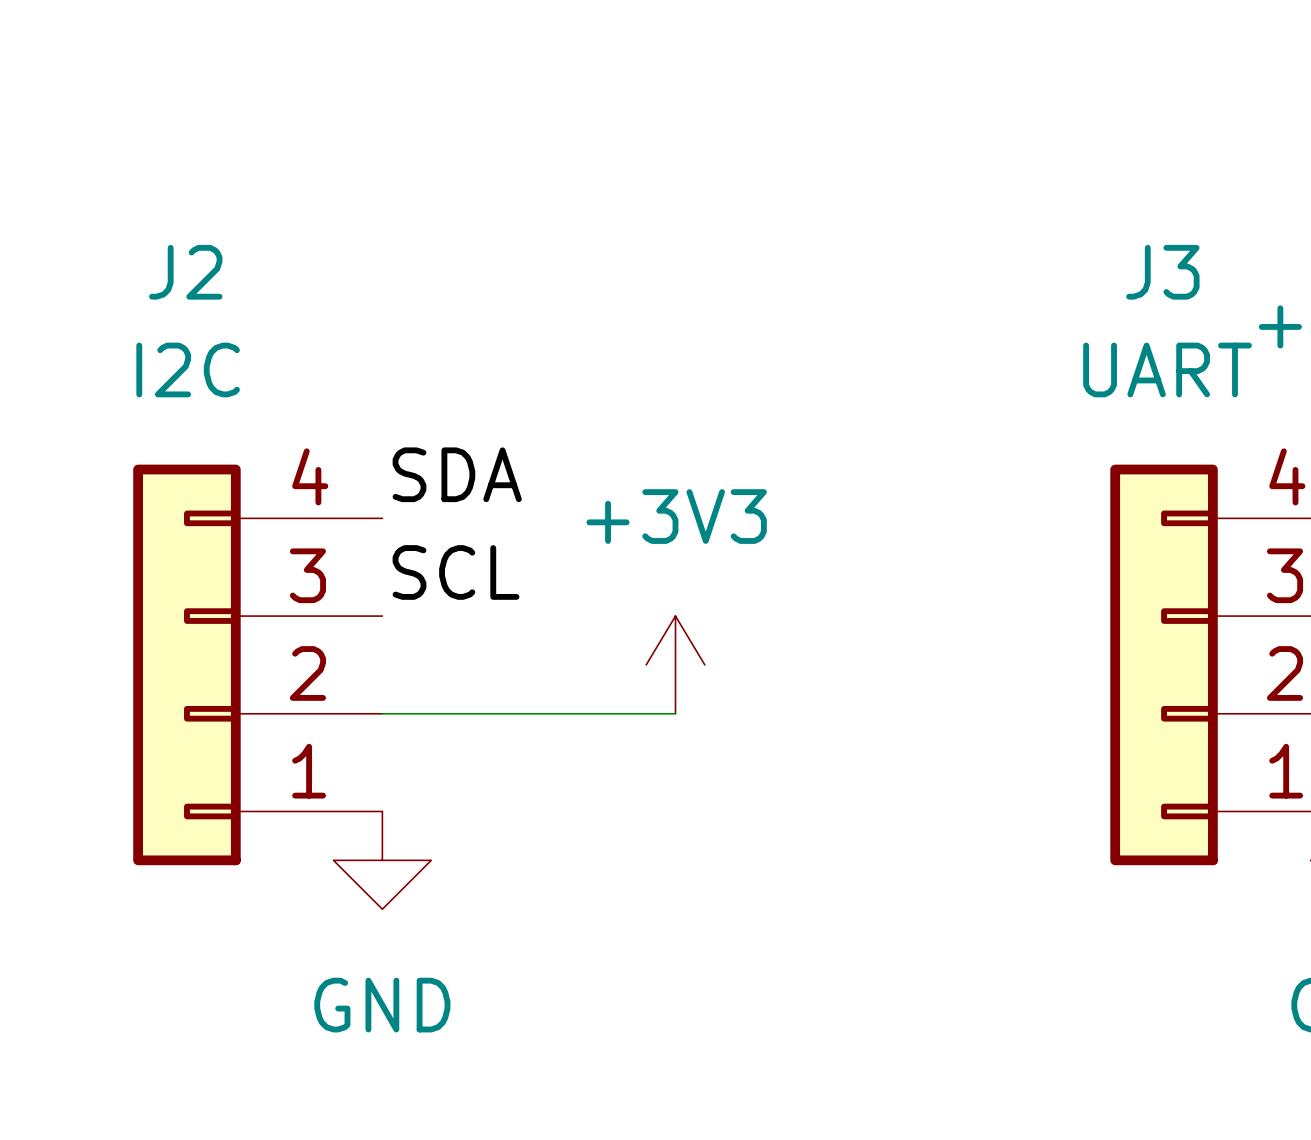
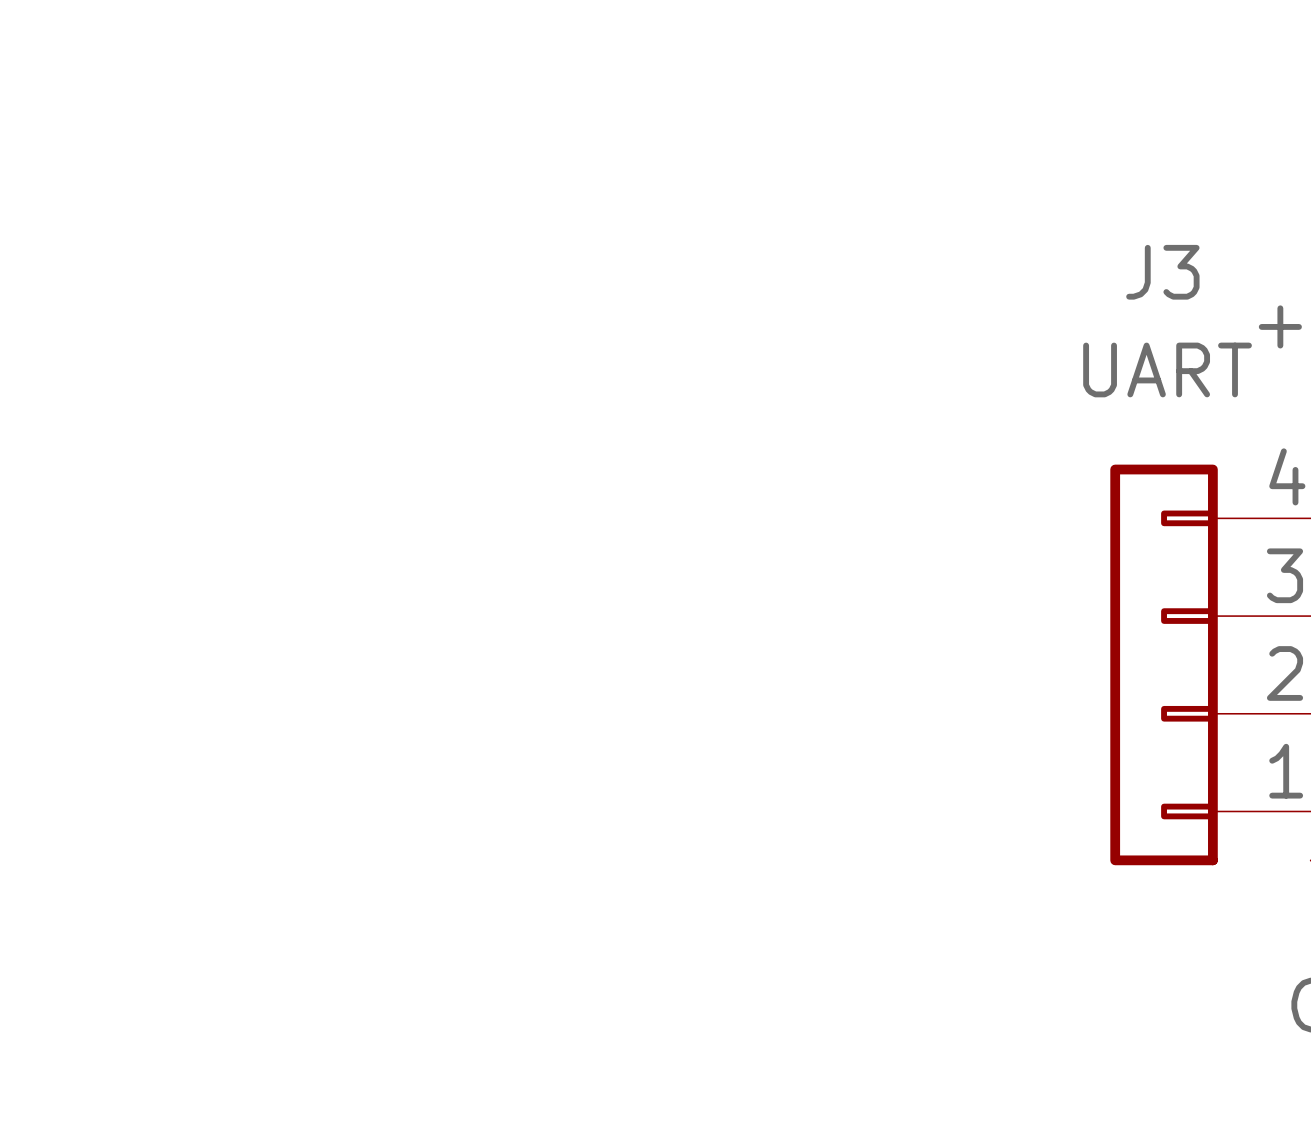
label: SDA (457, 474) -> none
label: SCL (456, 572) -> none
J2: I2C (257, 664) -> none
power symbol: +3V3 (675, 664) -> none
wire: (382, 713) (675, 713) -> none
power symbol: GND (382, 860) -> none

